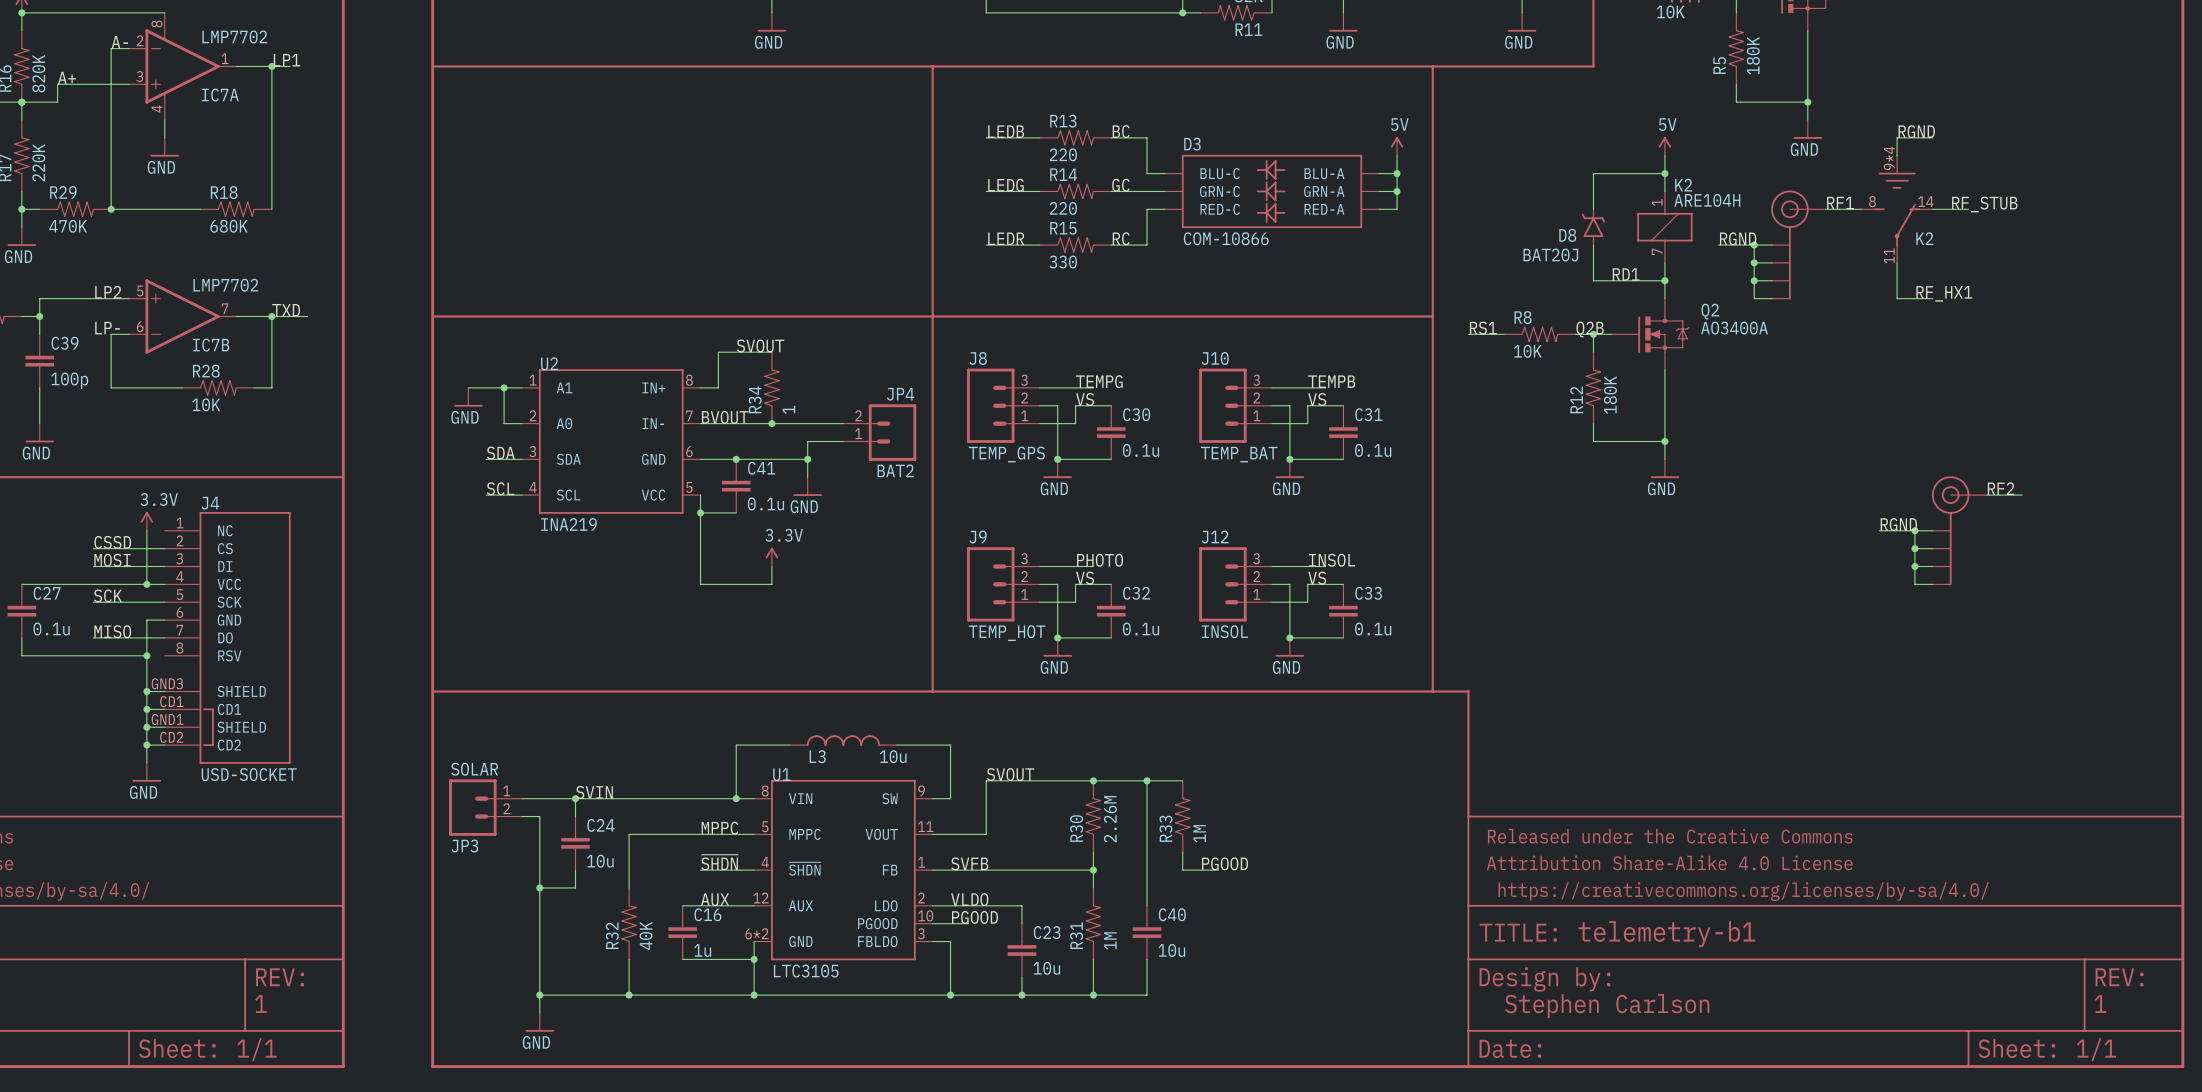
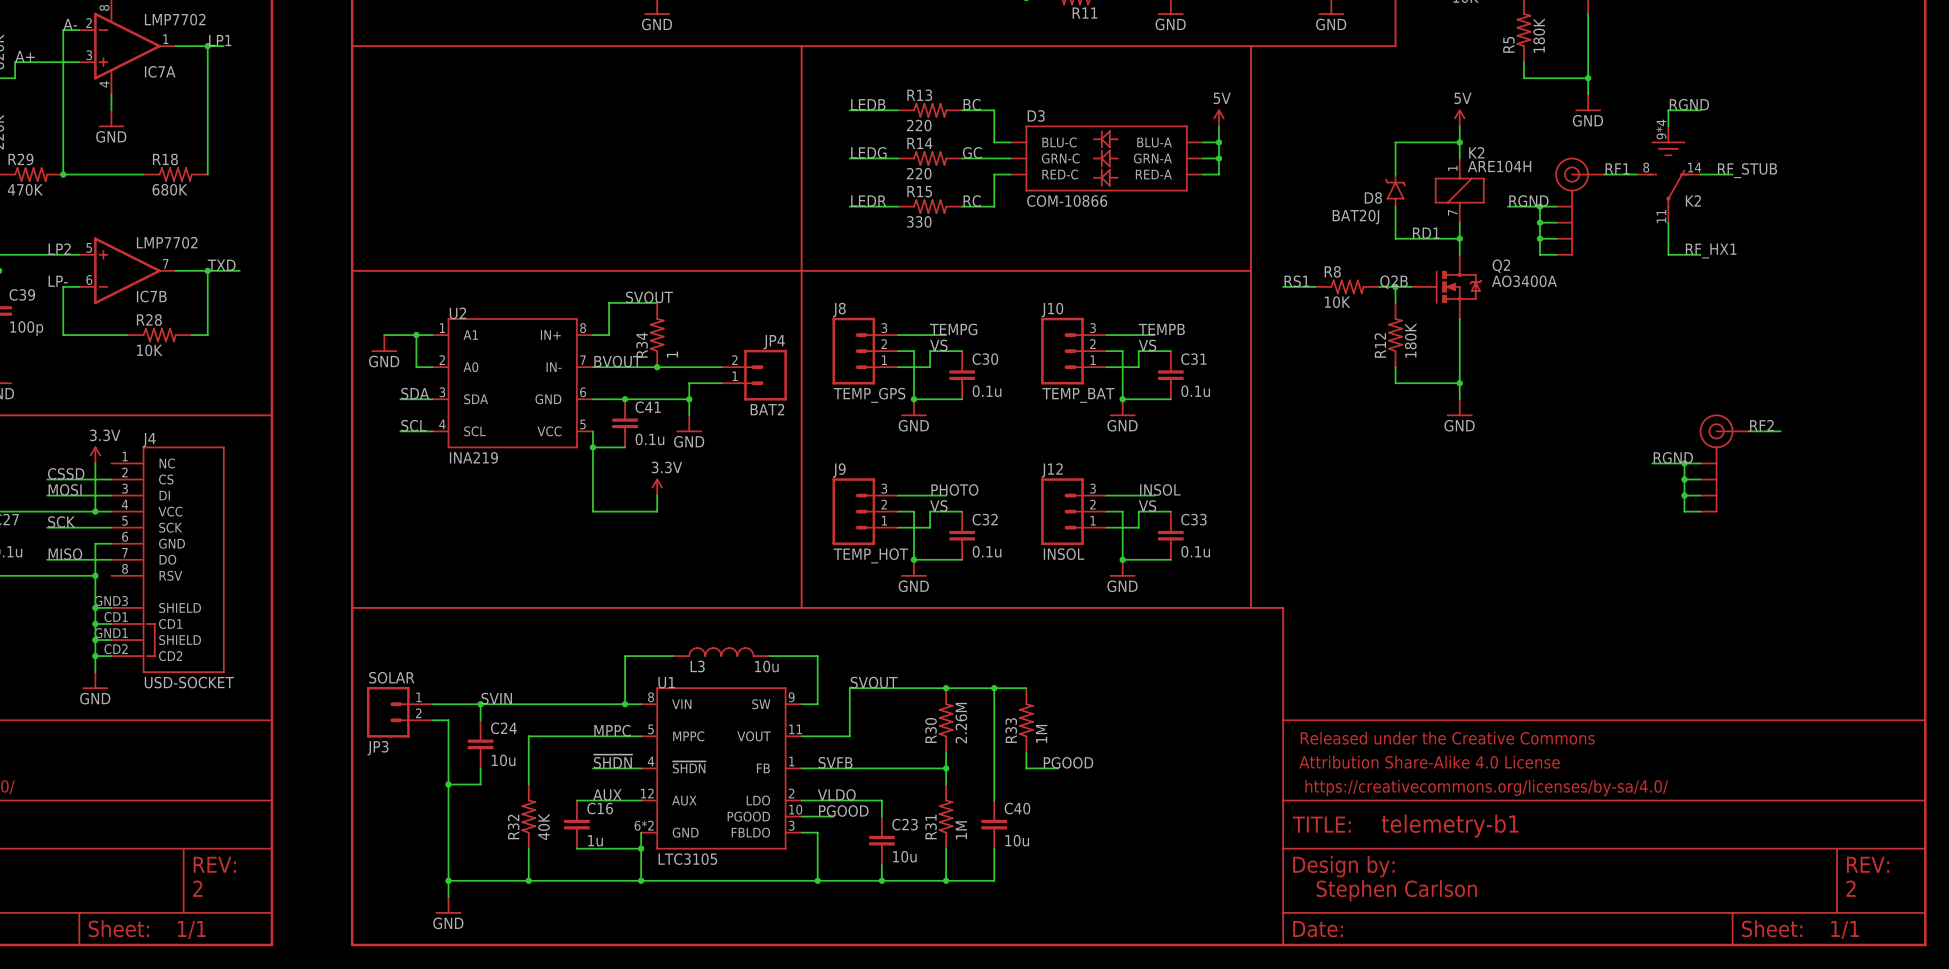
text: 1 (261, 1004) -> 2 (197, 888)
text: 1 (2100, 1004) -> 2 (1851, 888)

